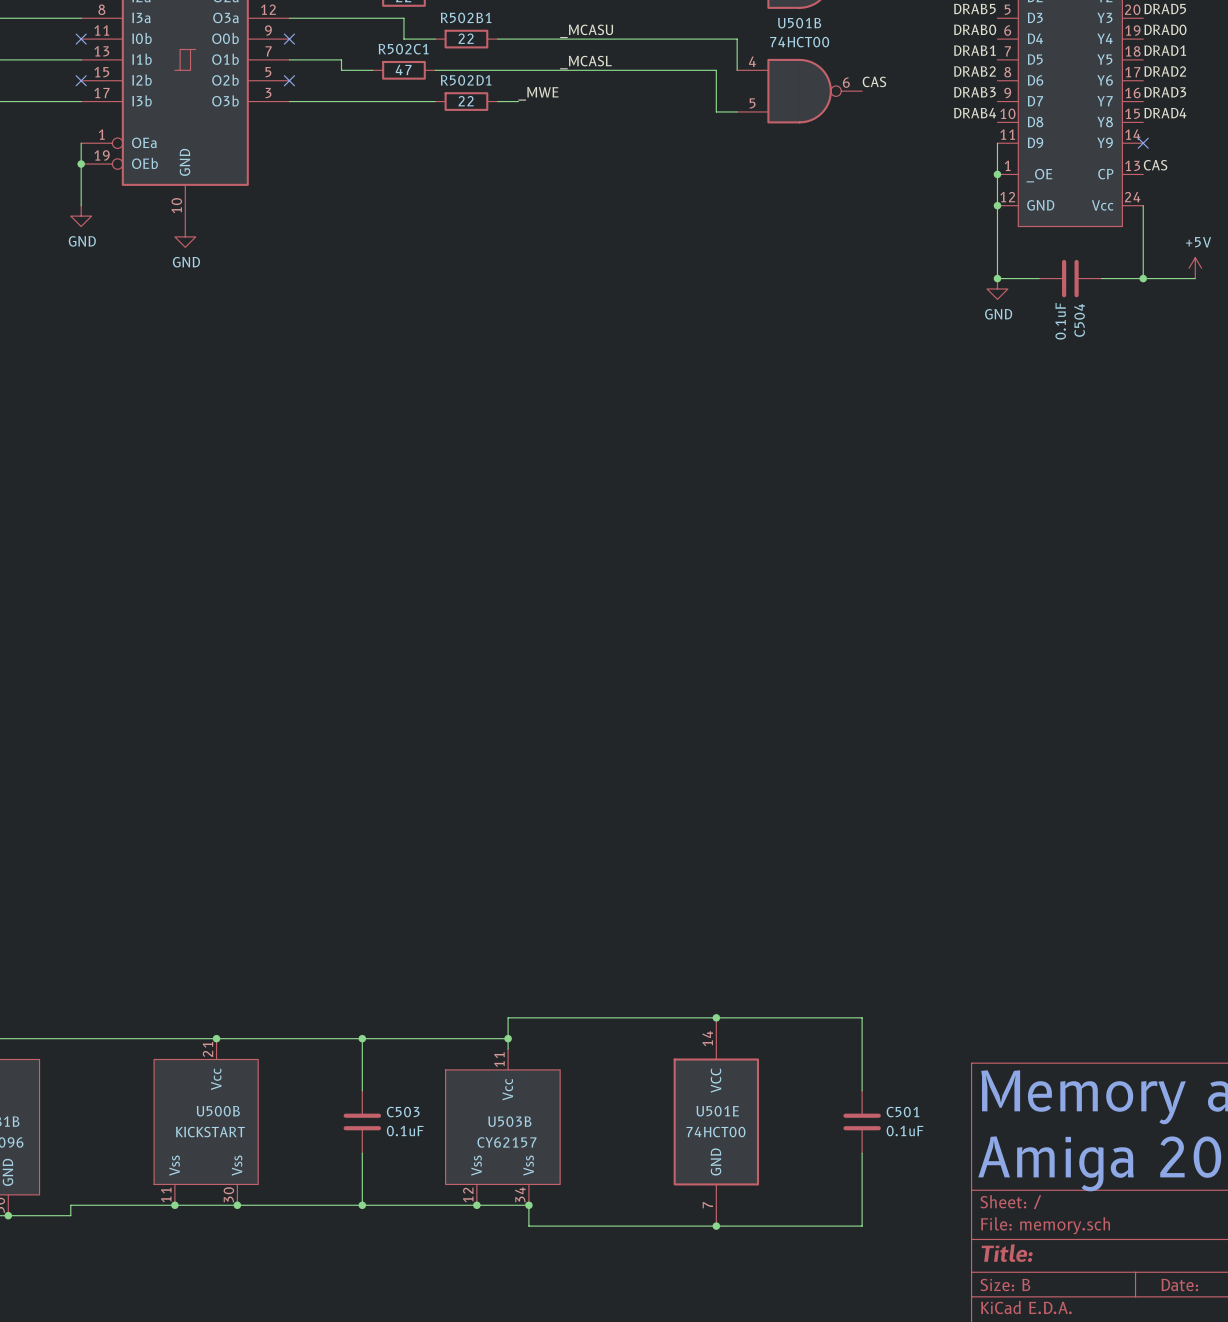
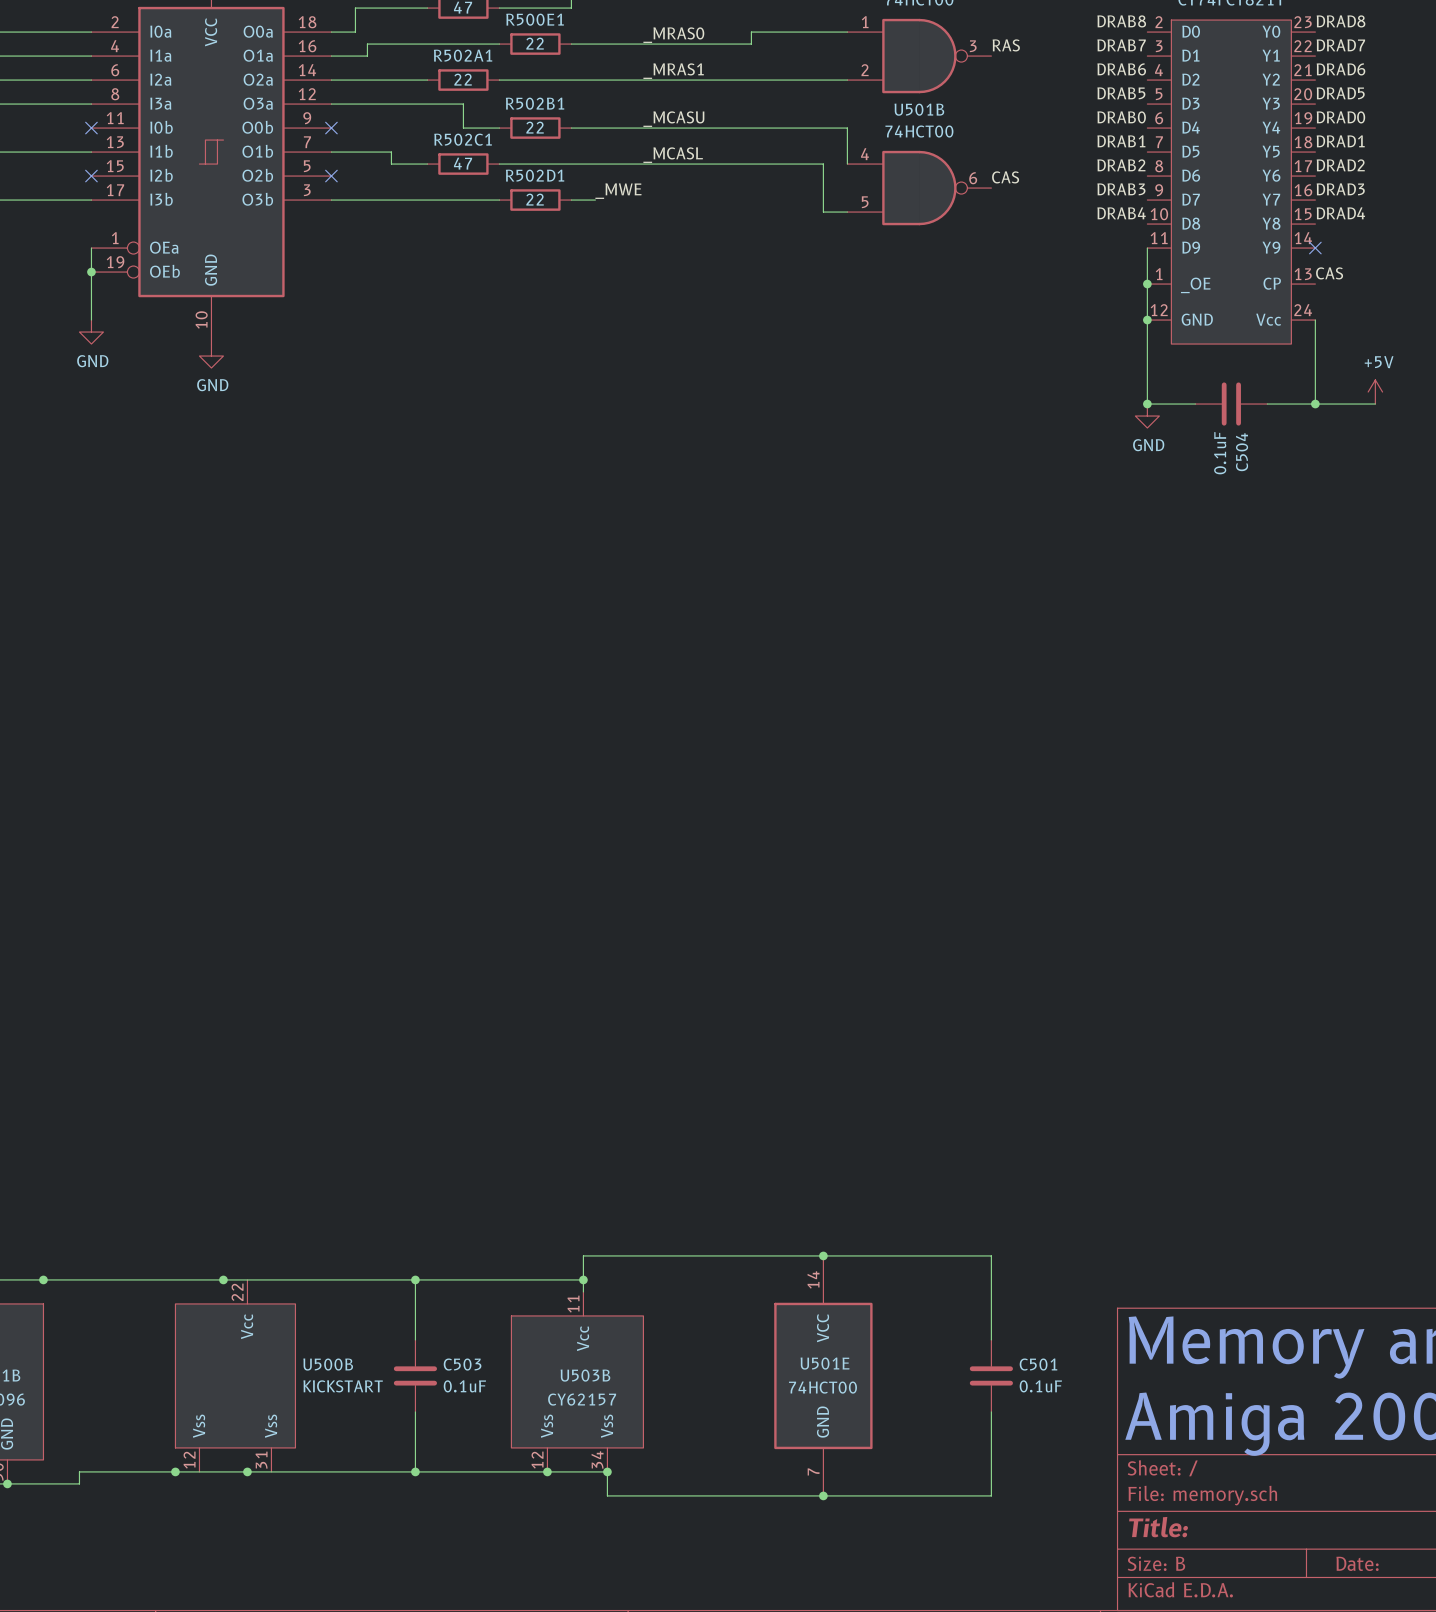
junction: none -> (43, 1279)
junction position: (216, 1038) -> (223, 1279)
U500B pin number: 21 (207, 1049) -> 22 (237, 1292)
U500B name position: U500B (218, 1111) -> U500B (328, 1364)
U500B value position: KICKSTART (210, 1132) -> KICKSTART (343, 1386)
U500B pin number: 30 (228, 1194) -> 31 (261, 1460)
U500B pin number: 11 (166, 1195) -> 12 (189, 1460)
junction: none -> (175, 1471)
junction: (174, 1205) -> none
junction: none -> (247, 1471)
junction: (237, 1205) -> none

